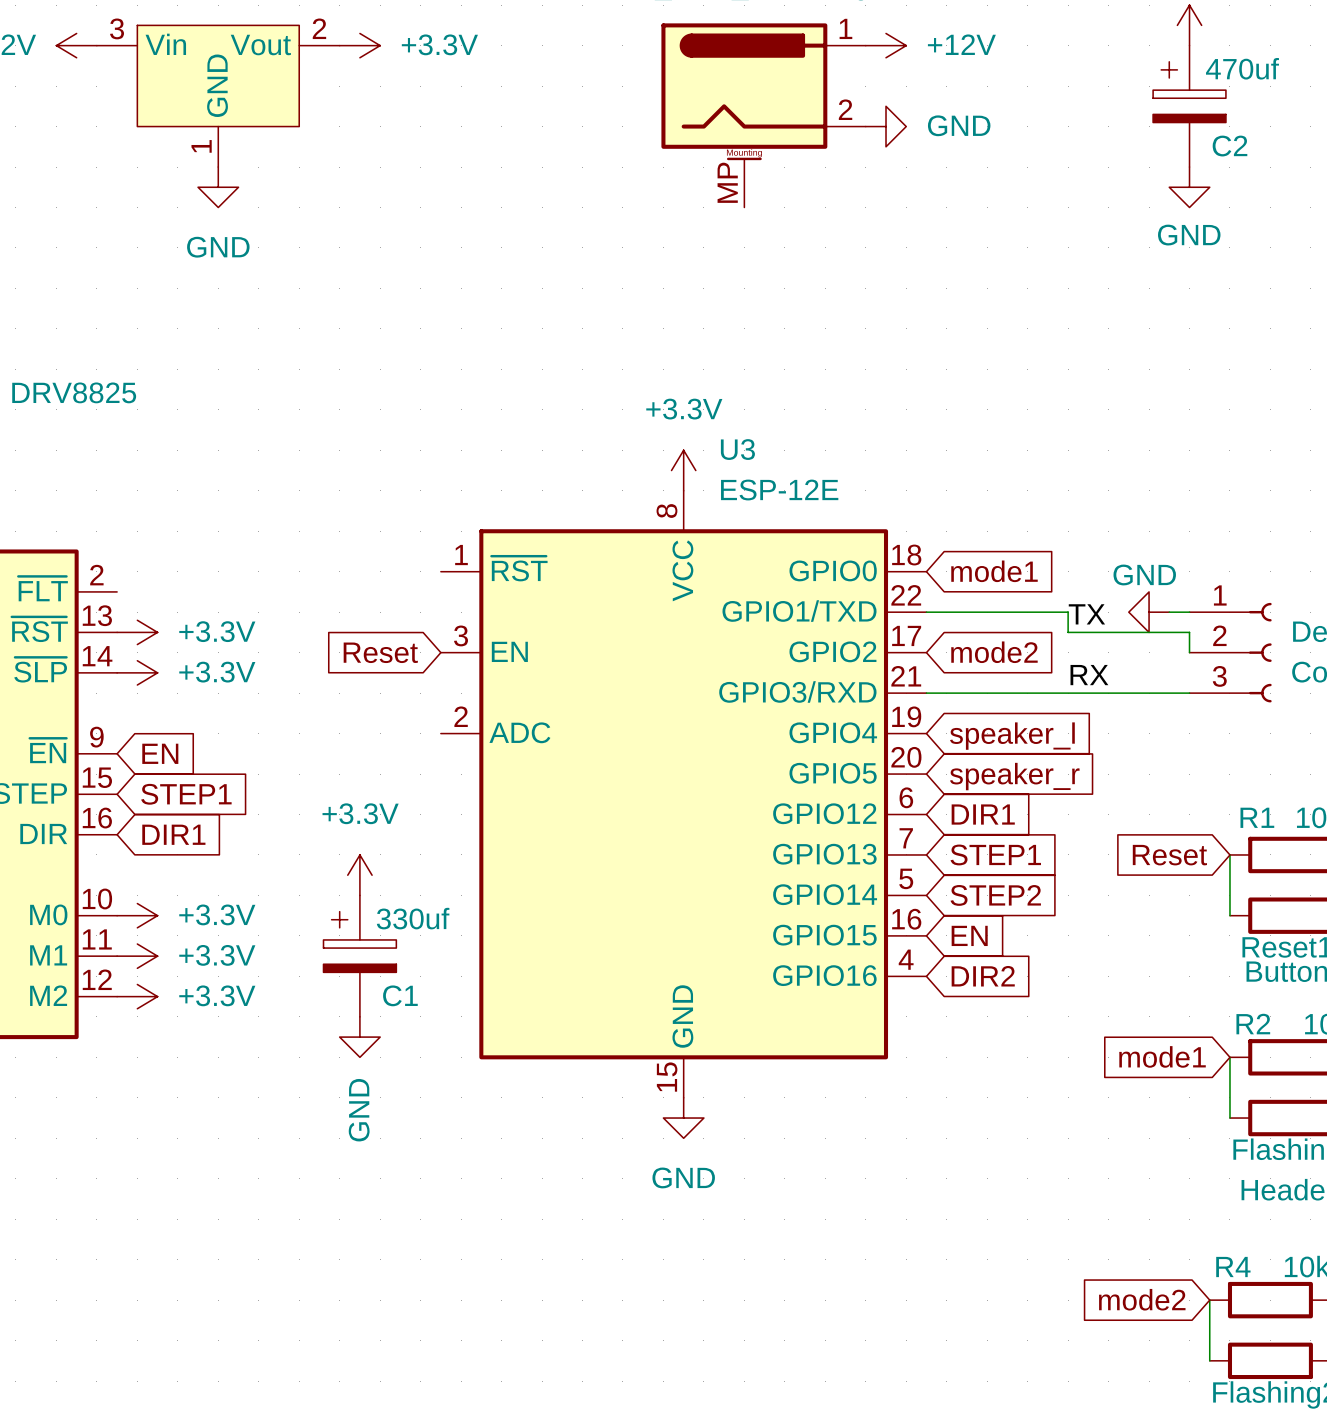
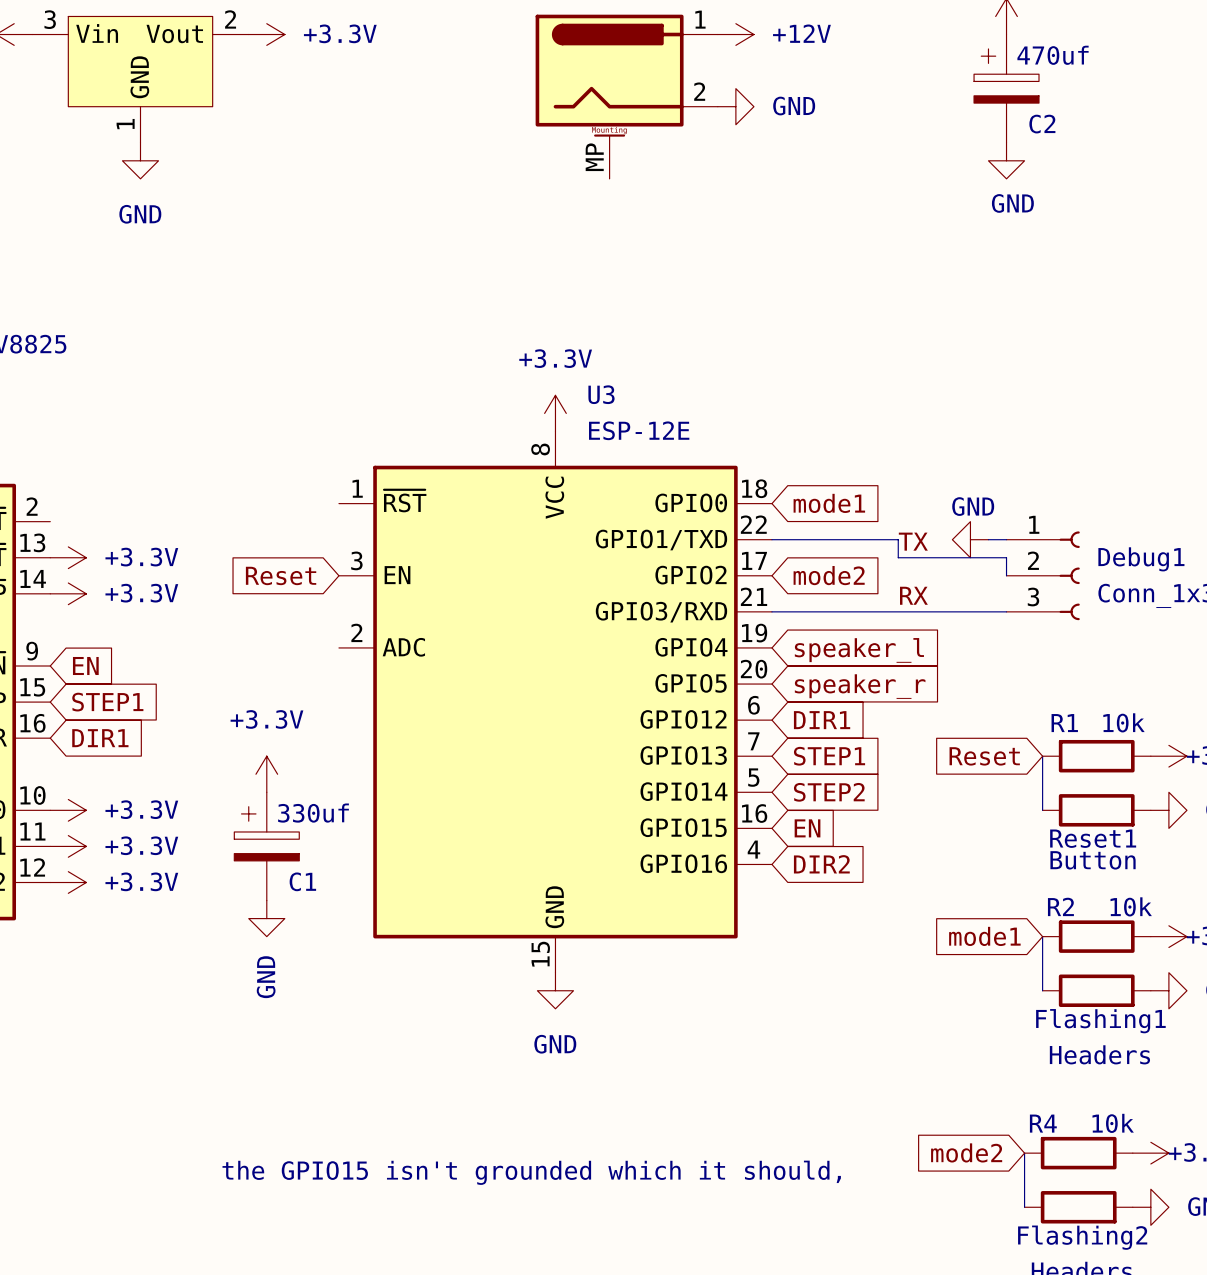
text: none -> the GPIO15 isn't grounded which it should, (531, 1172)

